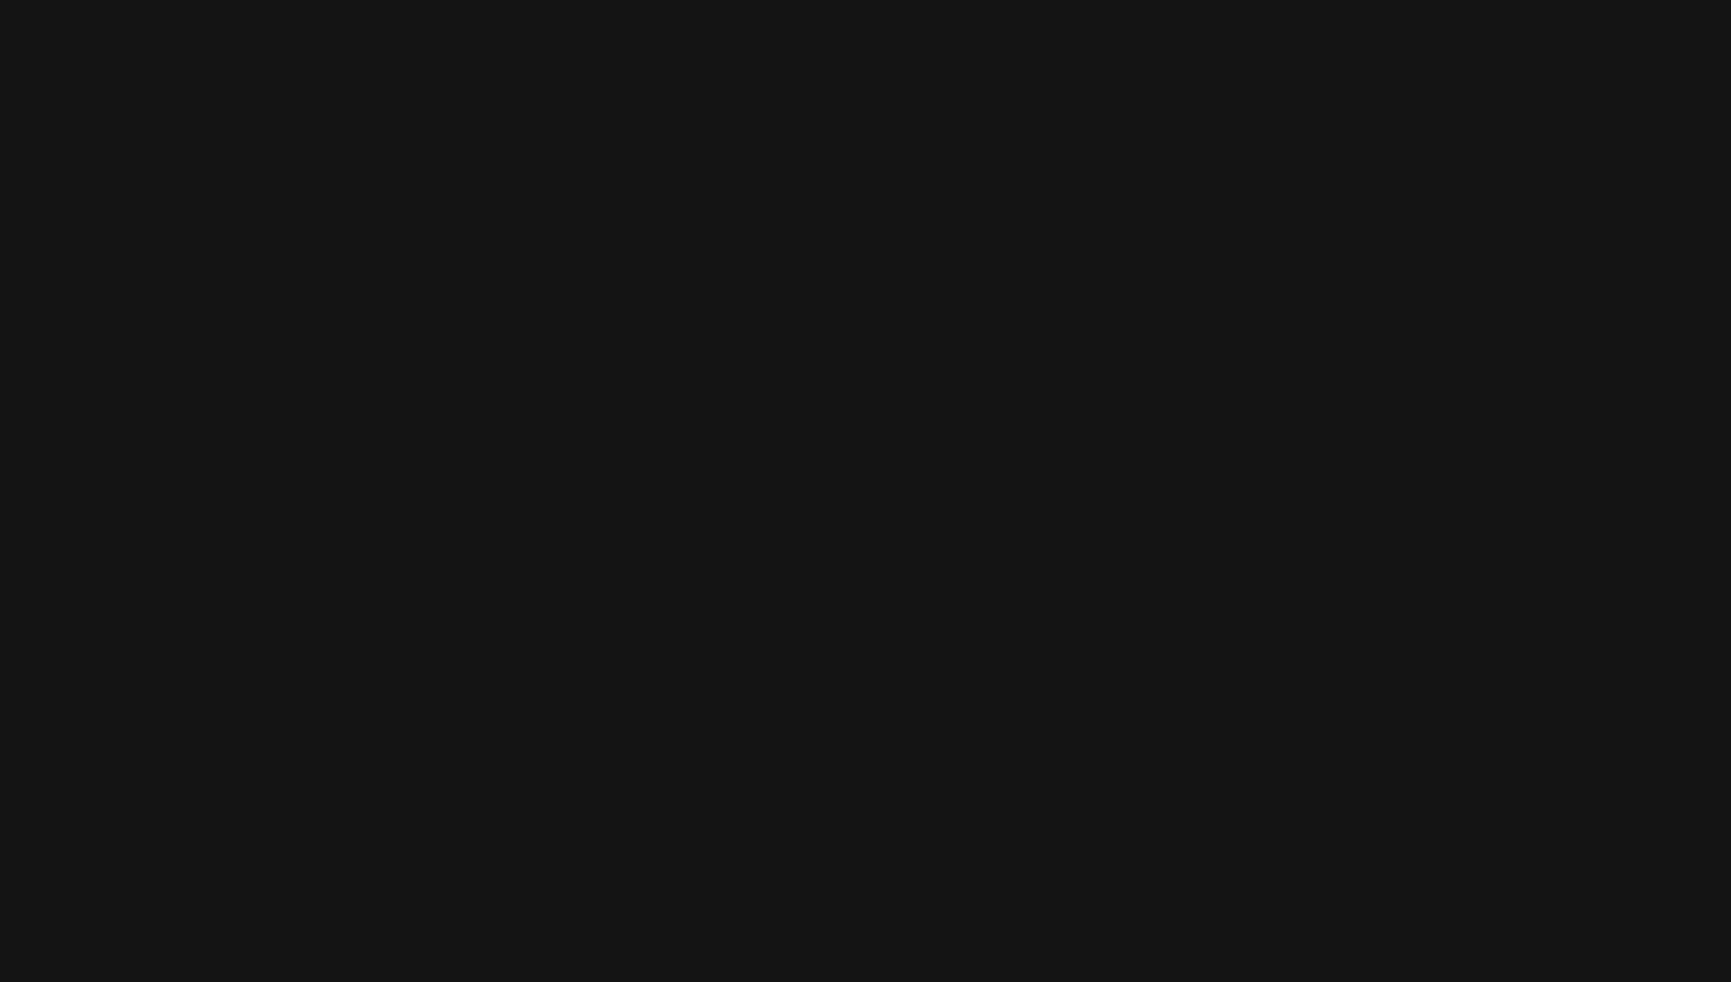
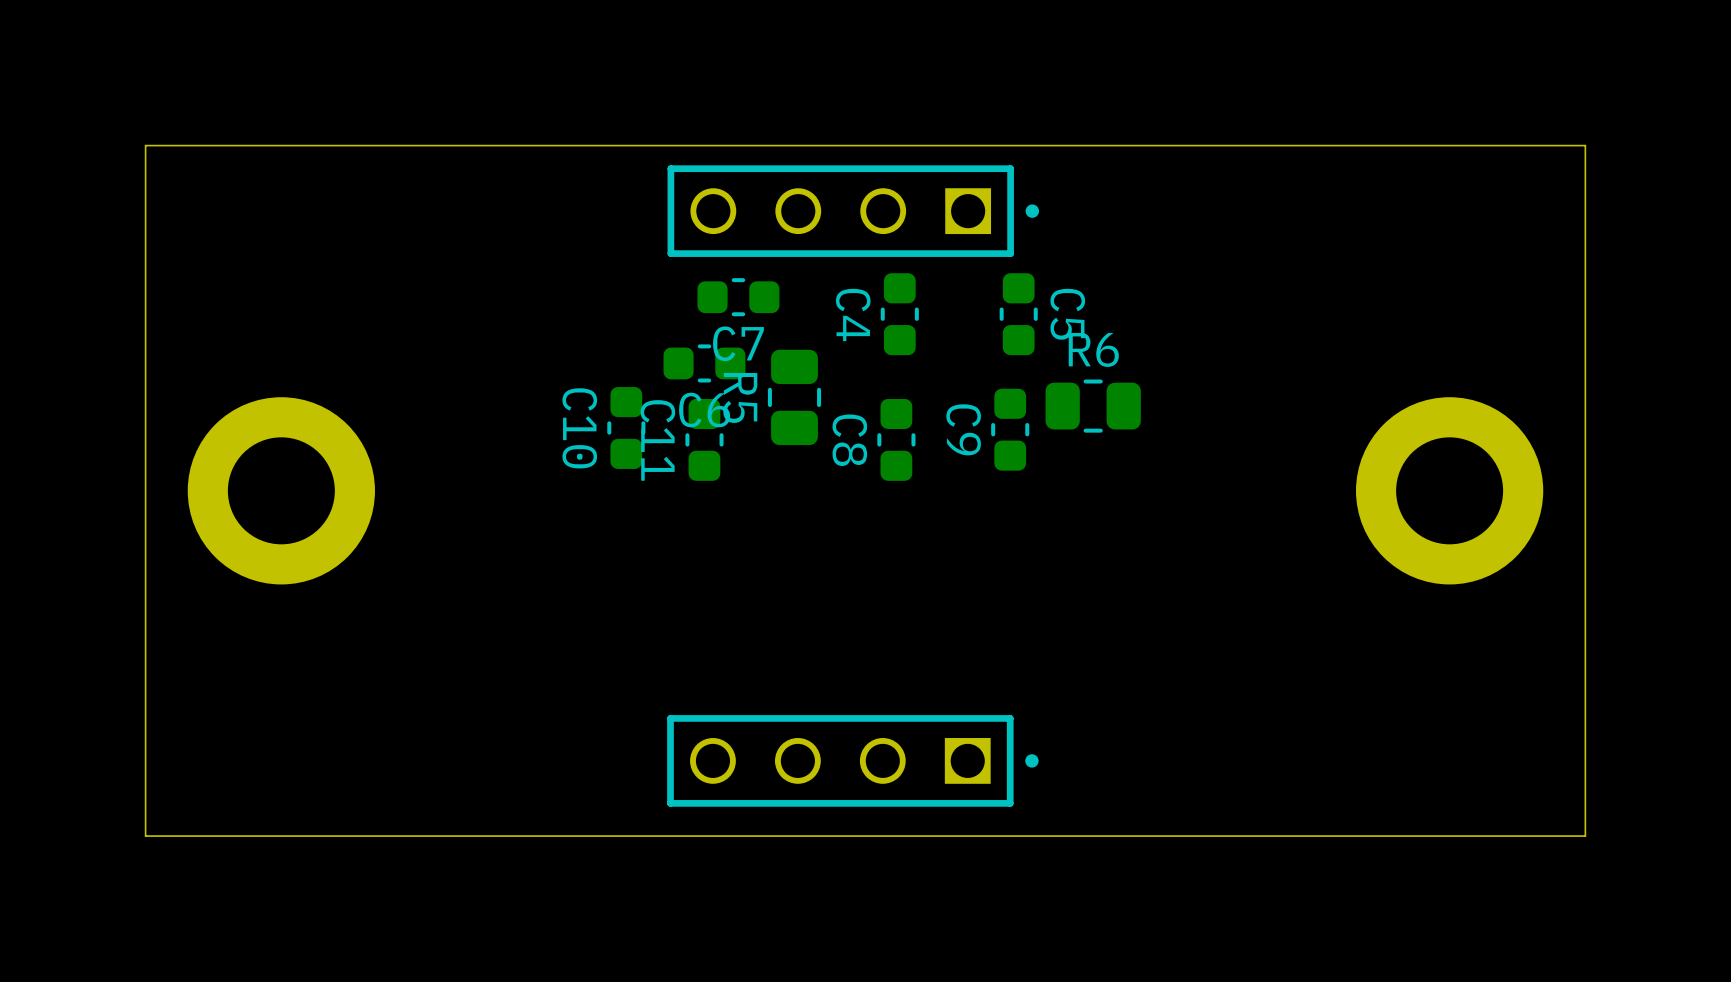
board edge: none -> (1585, 145) (145, 145) (145, 836) (1585, 836) (1585, 145)
part: none -> (853, 211)
C7: none -> (738, 297)
C4: none -> (899, 314)
C5: none -> (1018, 314)
C6: none -> (704, 363)
R5: none -> (794, 397)
R6: none -> (1093, 406)
C10: none -> (626, 427)
C9: none -> (1010, 429)
C11: none -> (704, 439)
C8: none -> (896, 439)
part: none -> (281, 490)
part: none -> (1449, 490)
part: none -> (852, 760)

